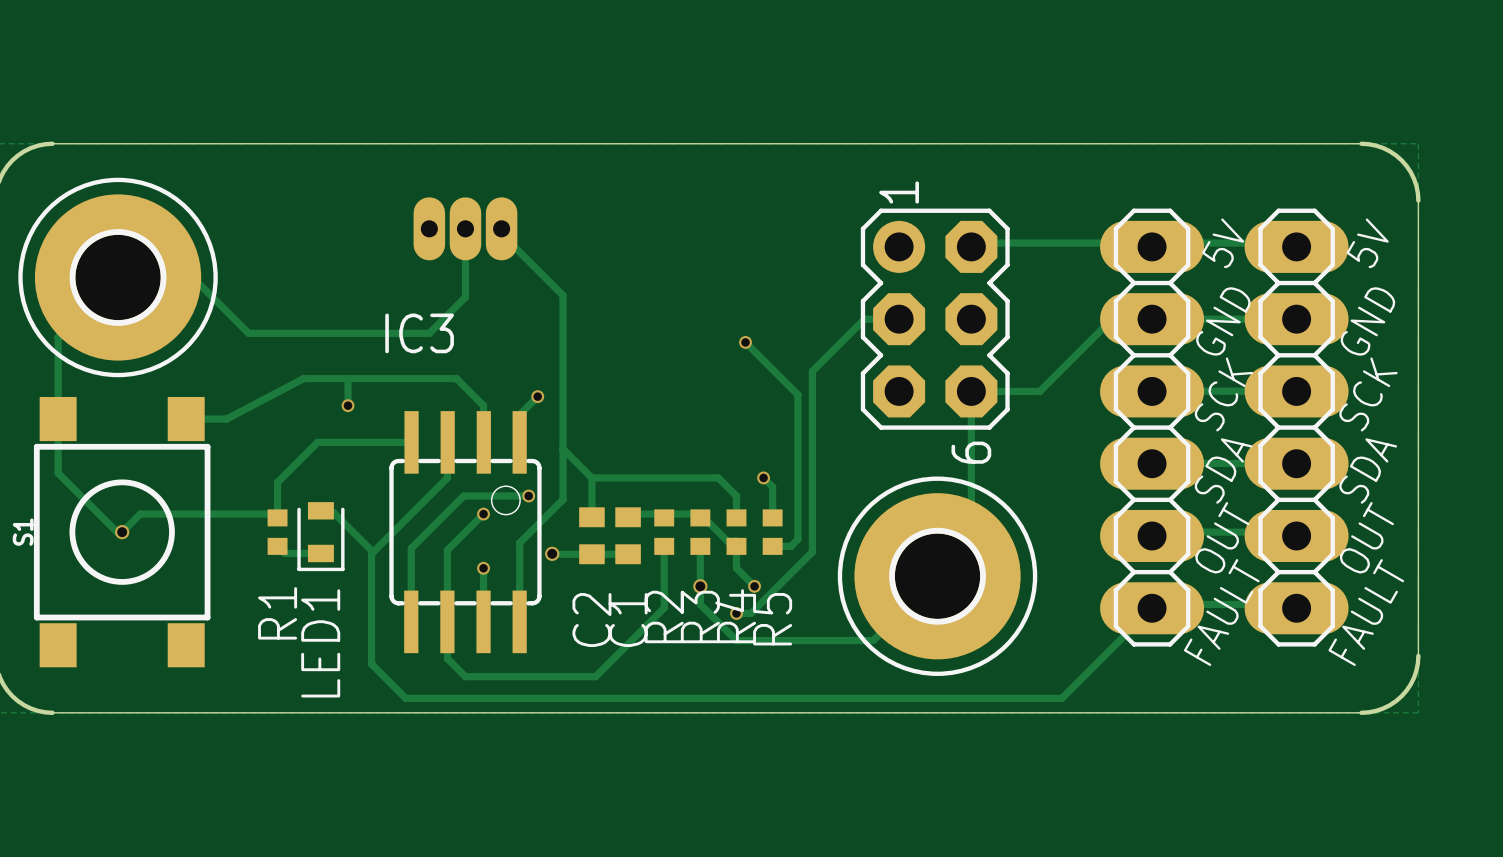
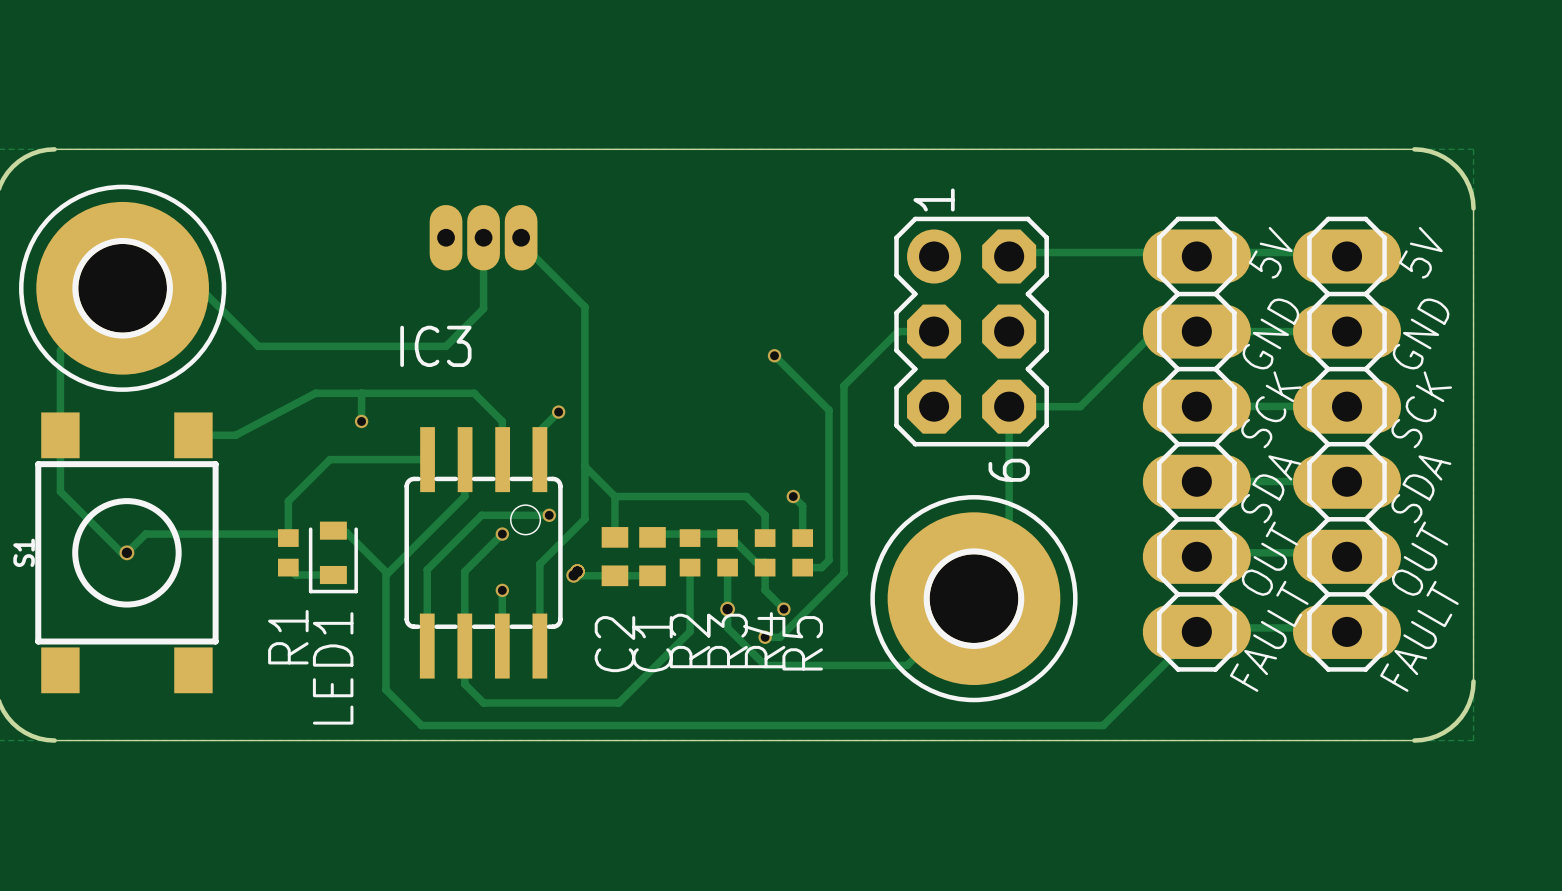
via: none -> (577, 571)

